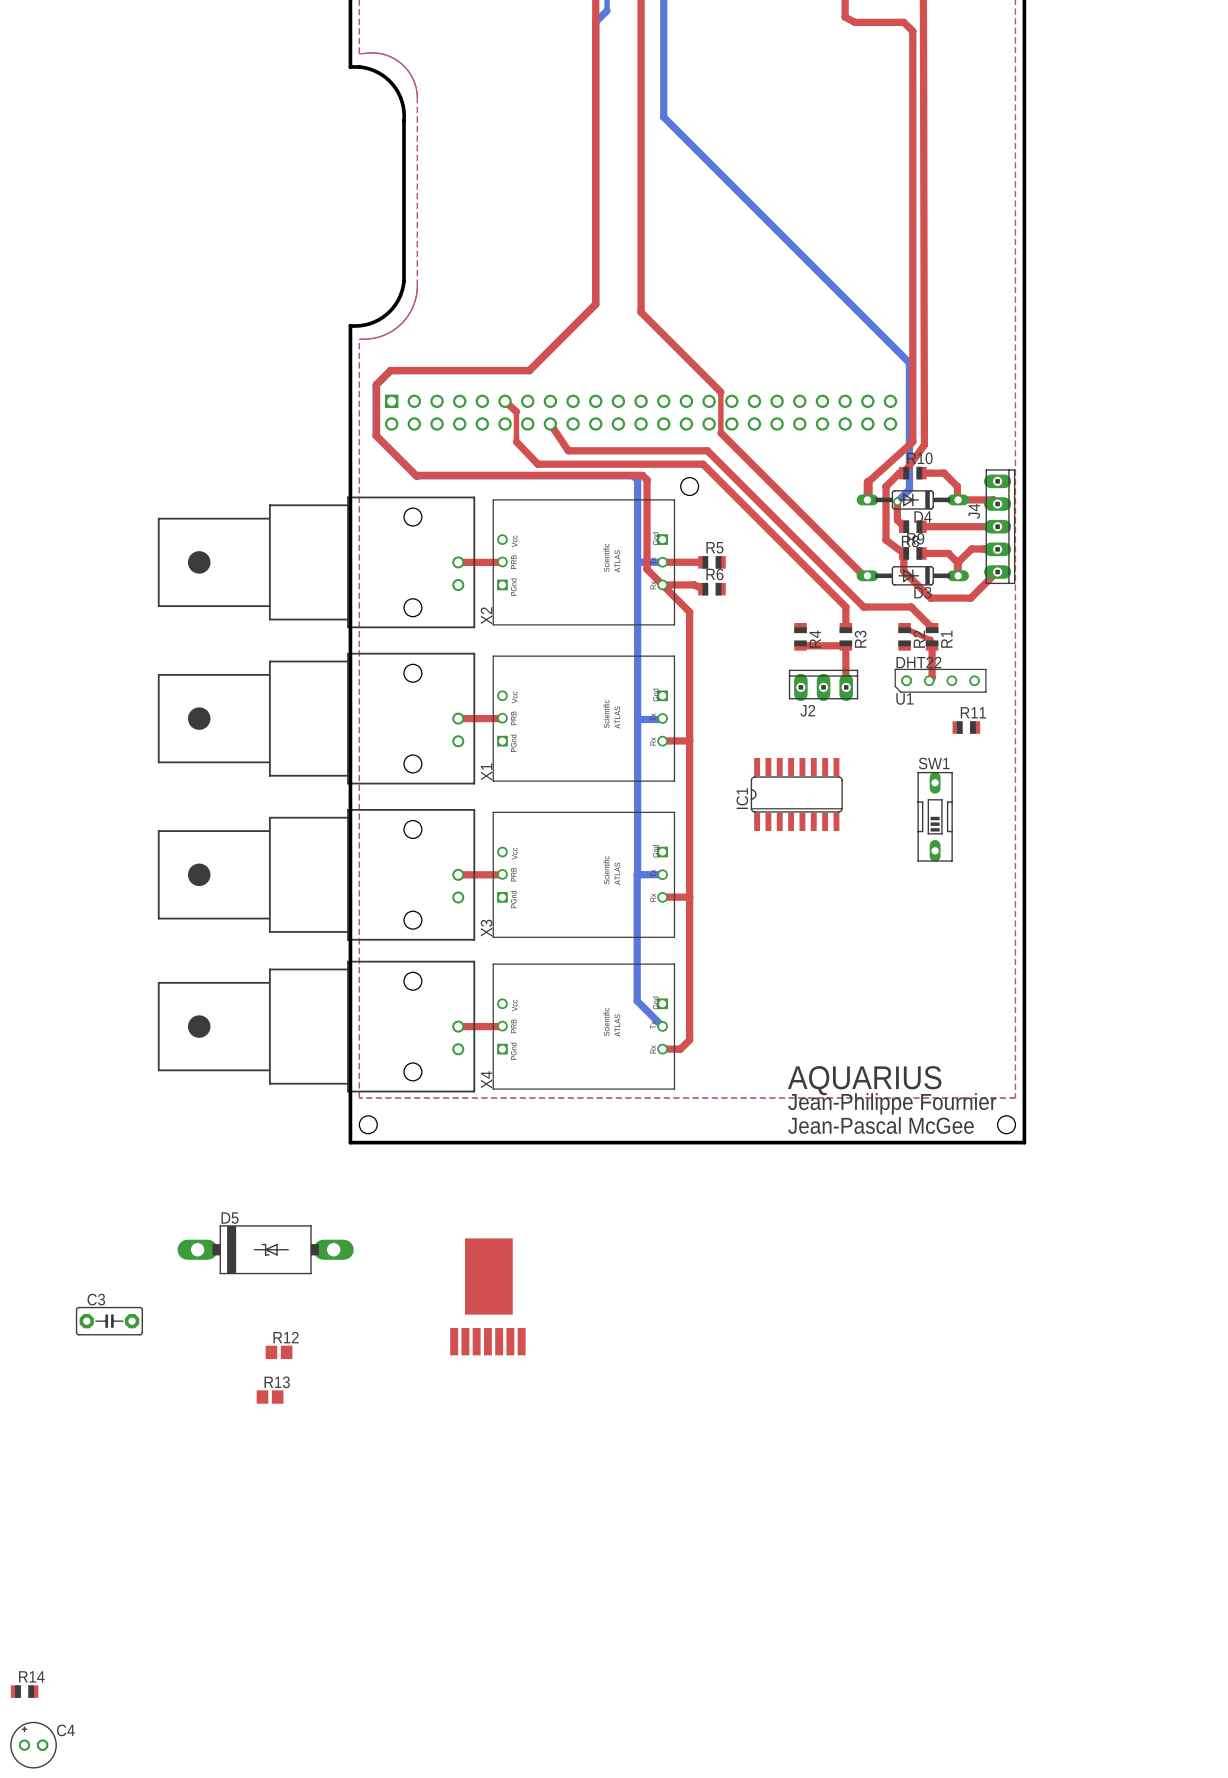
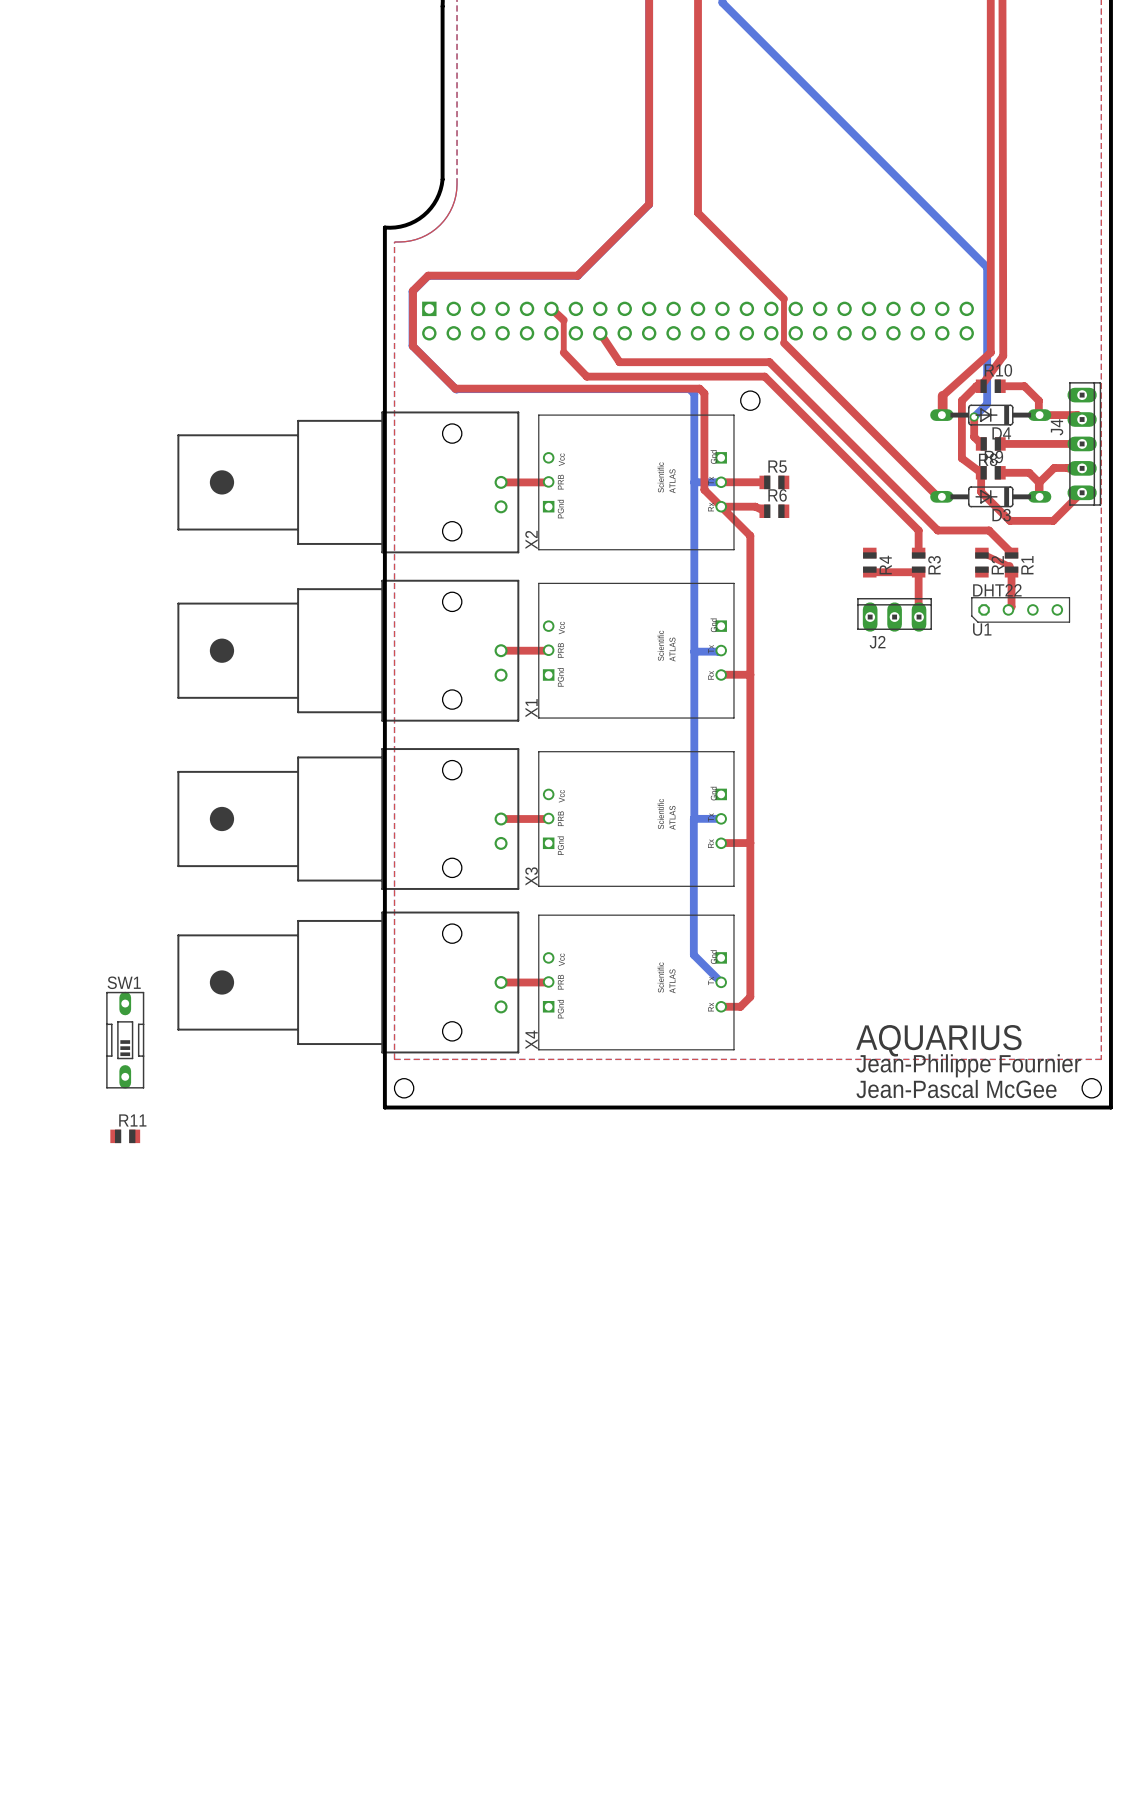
R11 position: (966, 727) -> (125, 1136)
IC1: (796, 794) -> none
SW1 position: (935, 816) -> (125, 1040)
D5: (265, 1249) -> none
part: (487, 1296) -> none
C3: (109, 1321) -> none
R12: (279, 1352) -> none
R13: (270, 1397) -> none
R14: (24, 1691) -> none
C4: (33, 1745) -> none

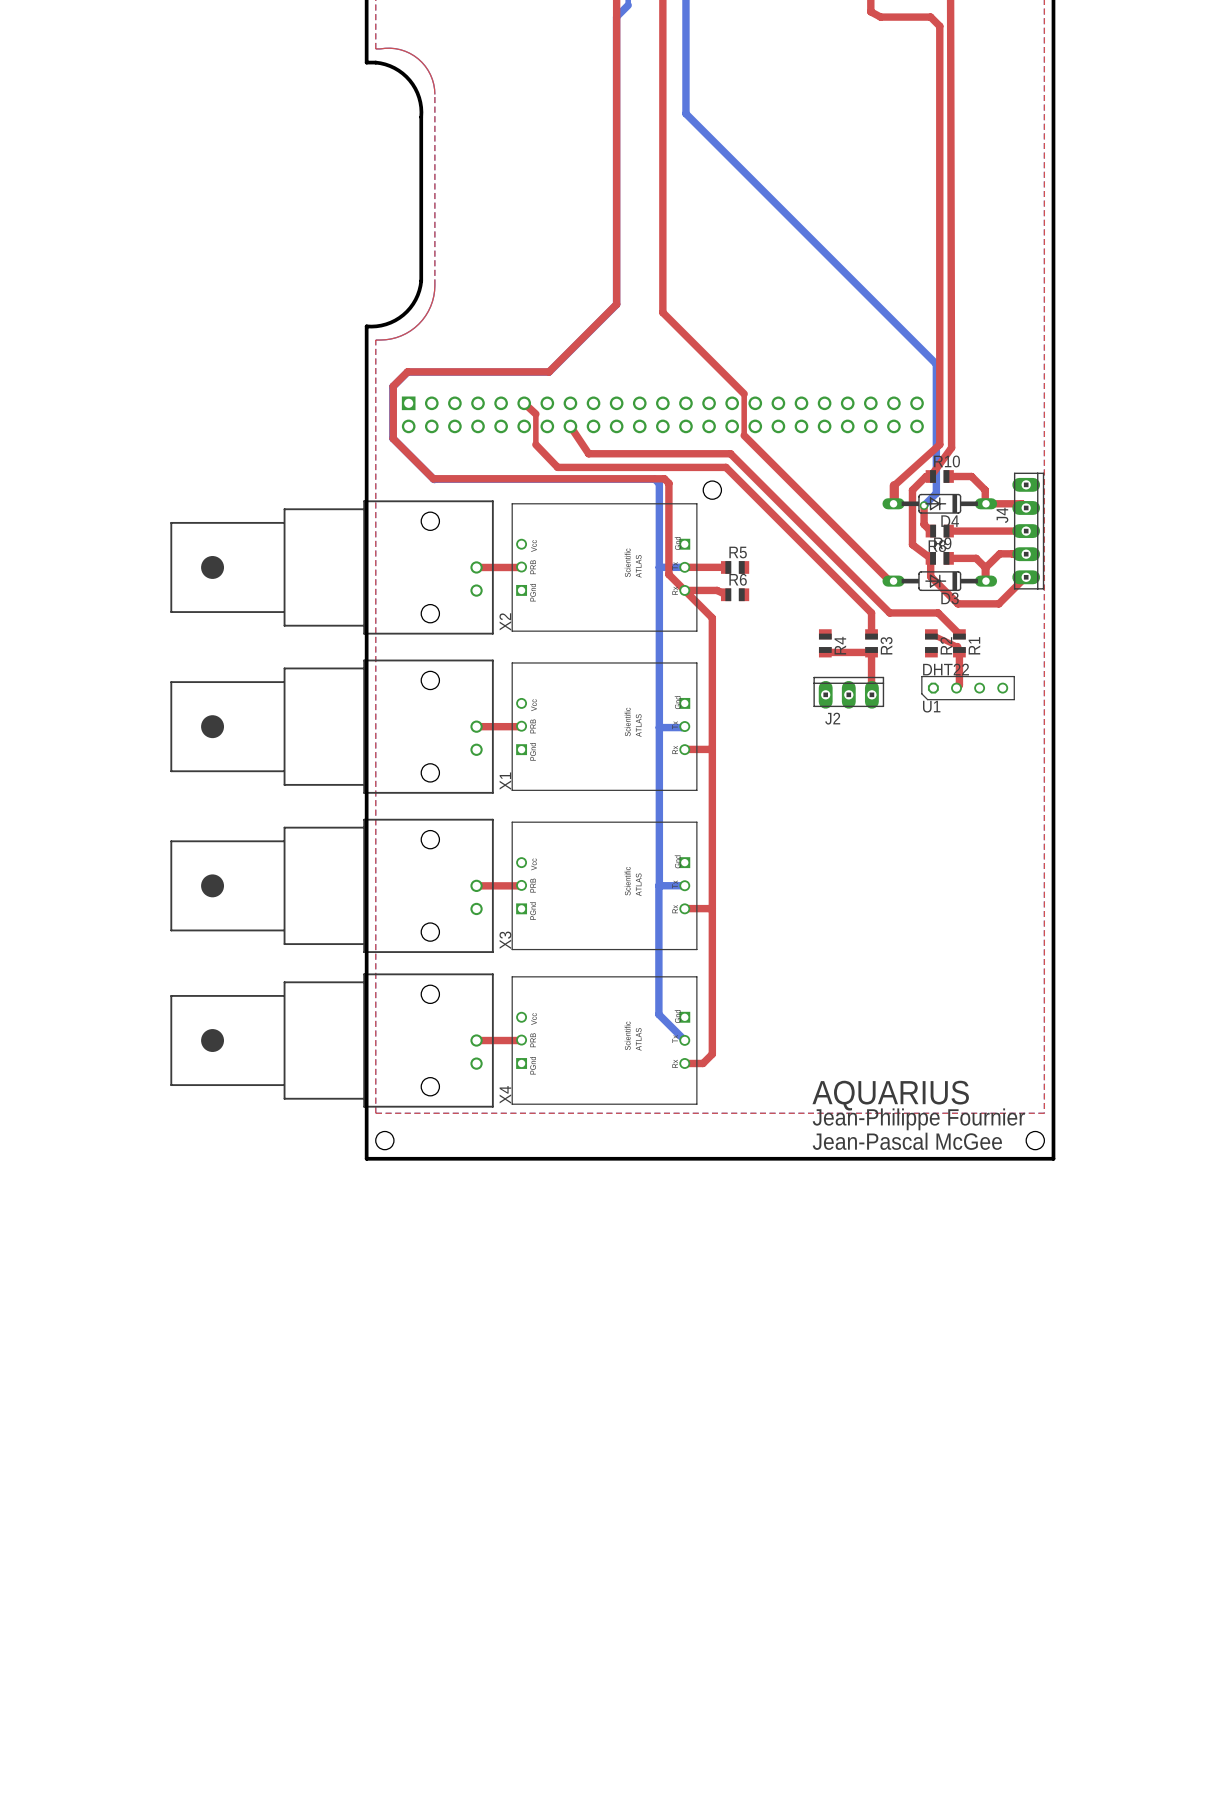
SW1: (125, 1040) -> none
R11: (125, 1136) -> none

